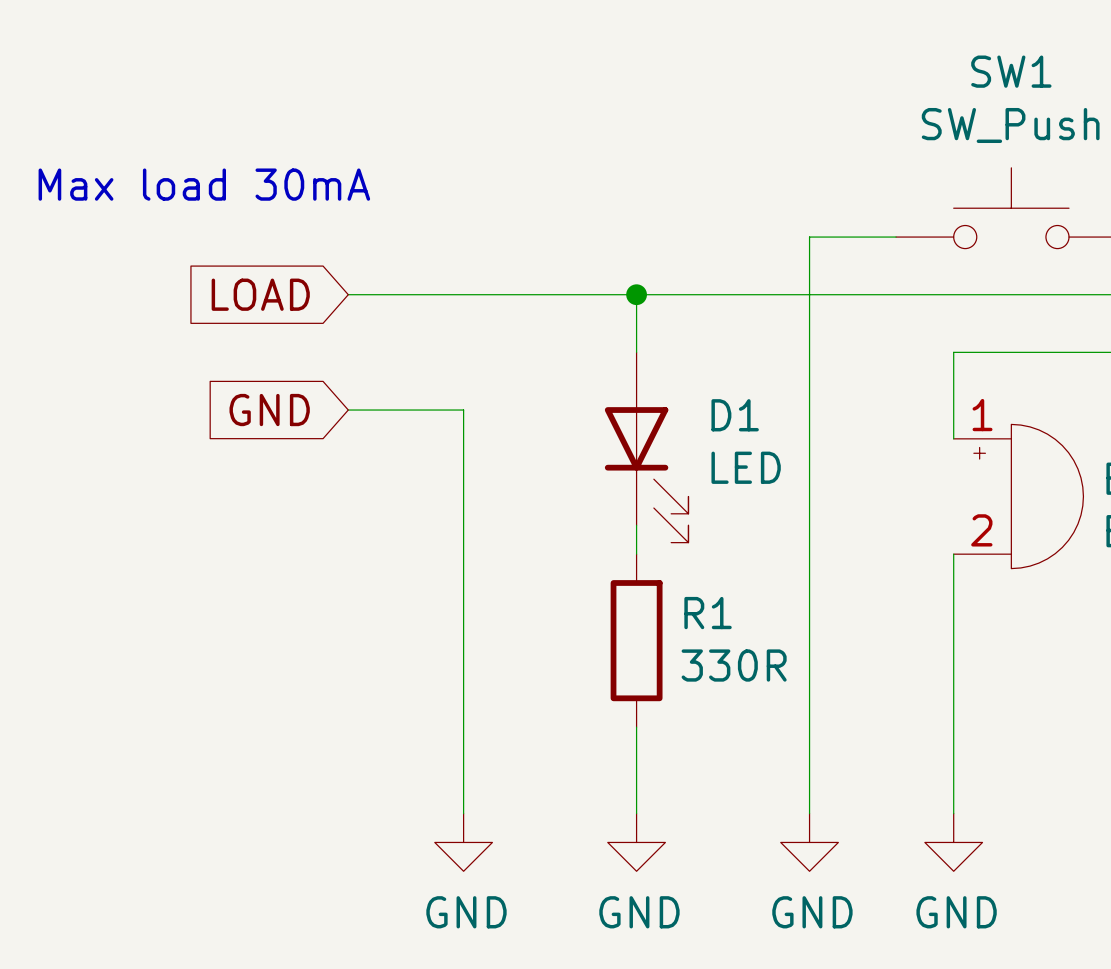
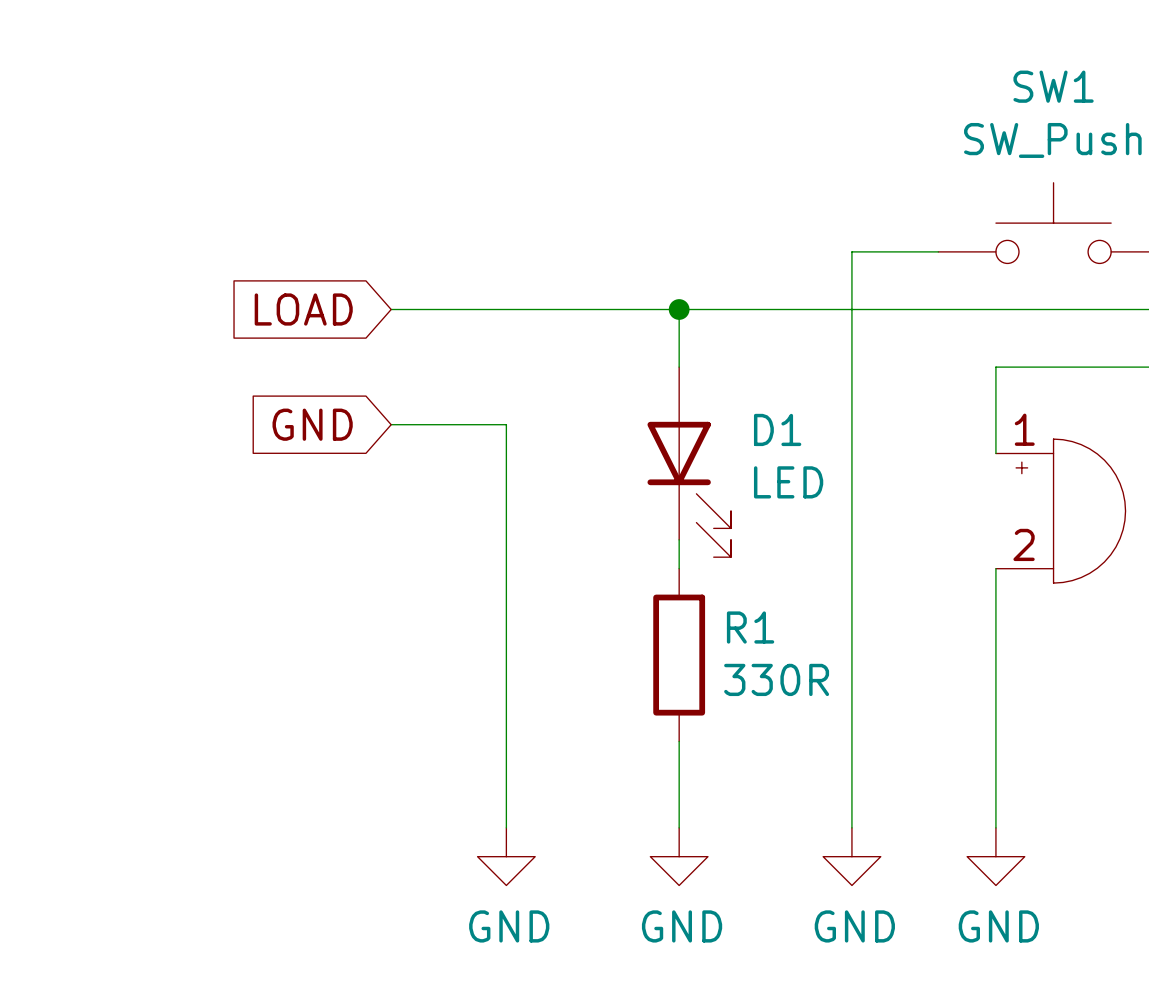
text: Max load 30mA (204, 184) -> none

